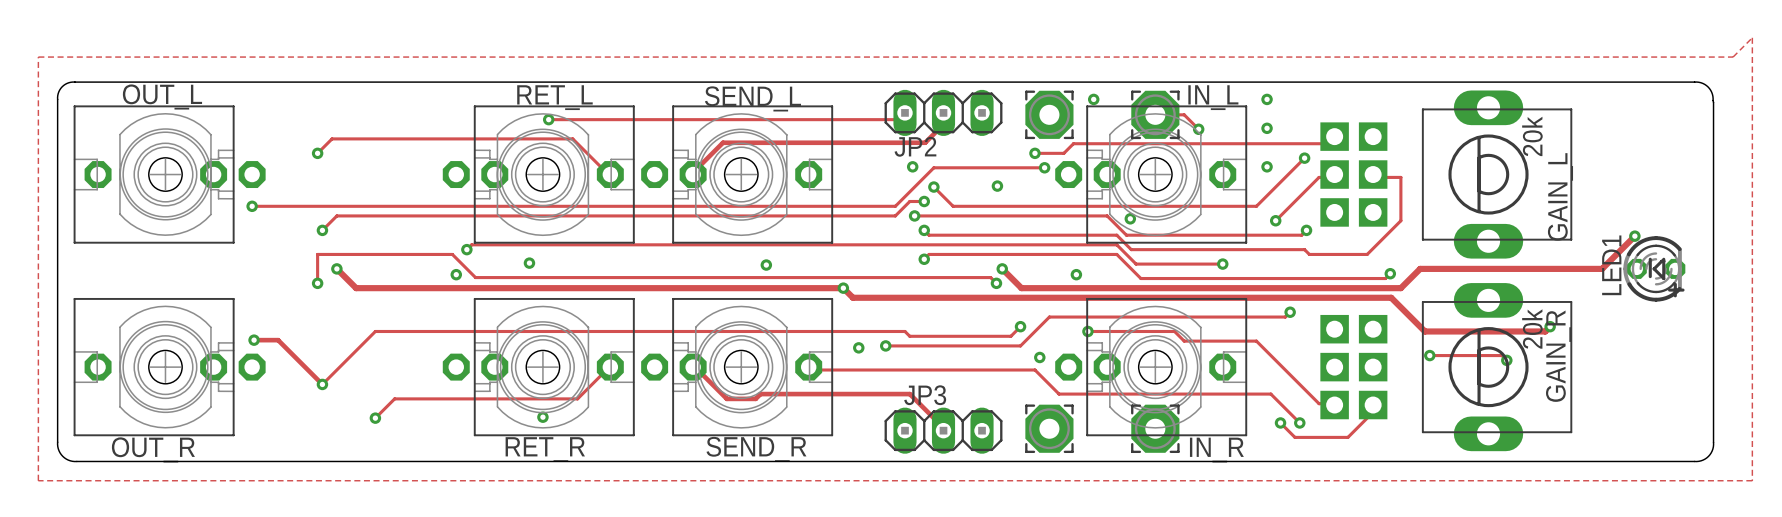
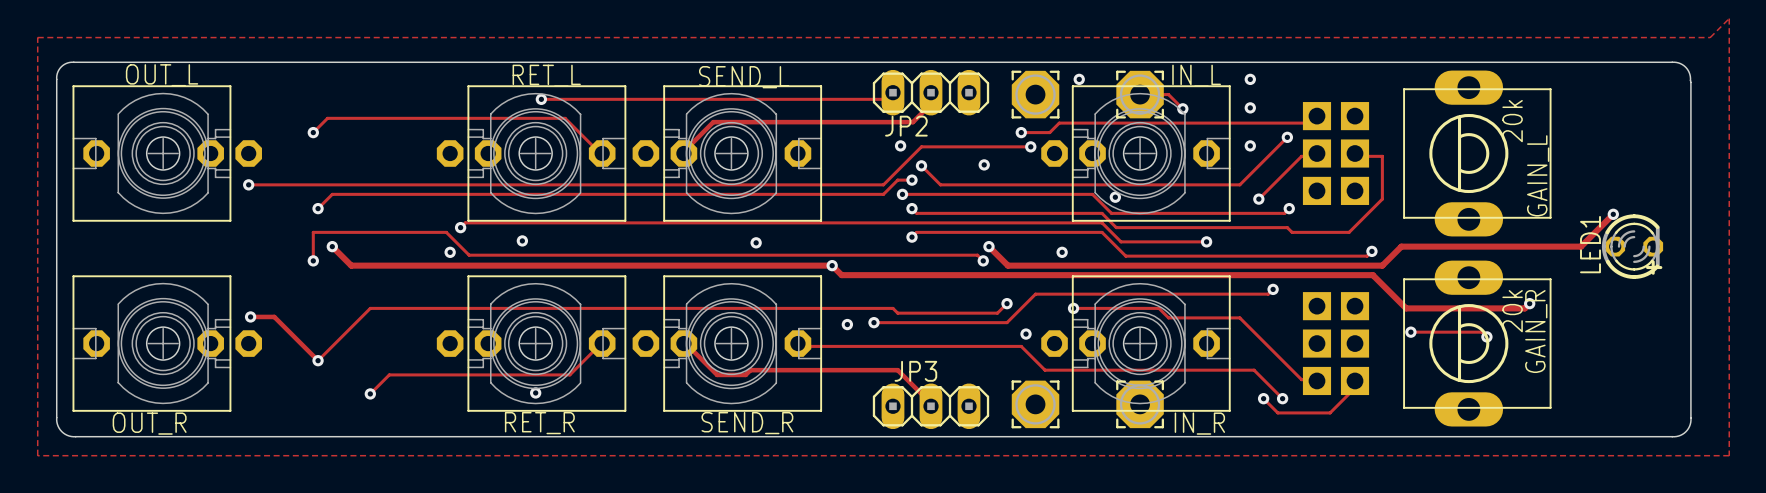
line: (1650, 259) (1650, 276) -> none
line: (1663, 259) (1663, 278) (1654, 268) (1661, 261) (1663, 261) -> none

